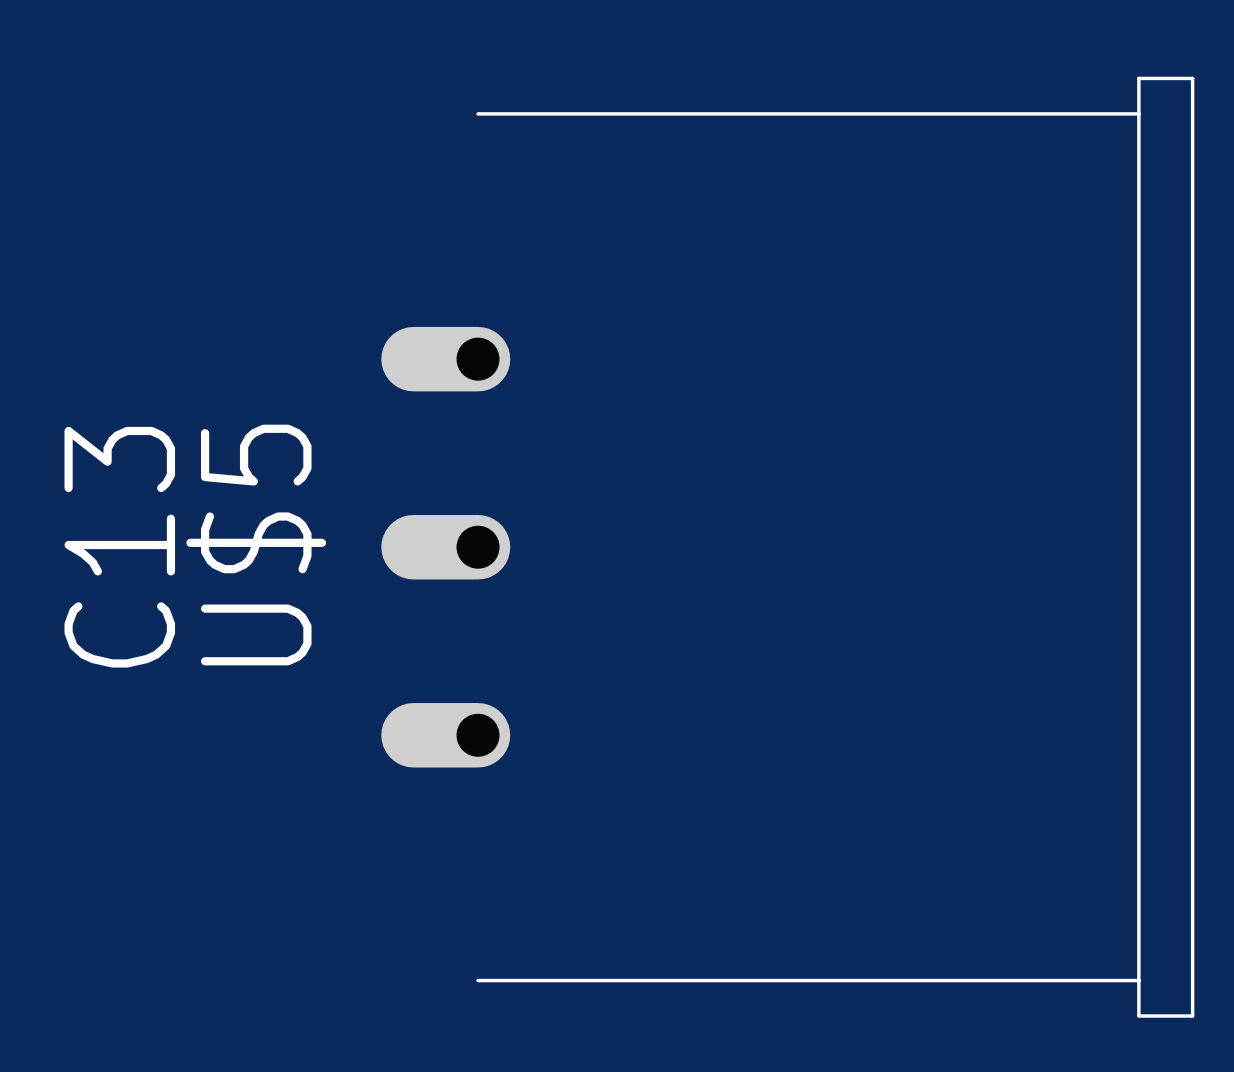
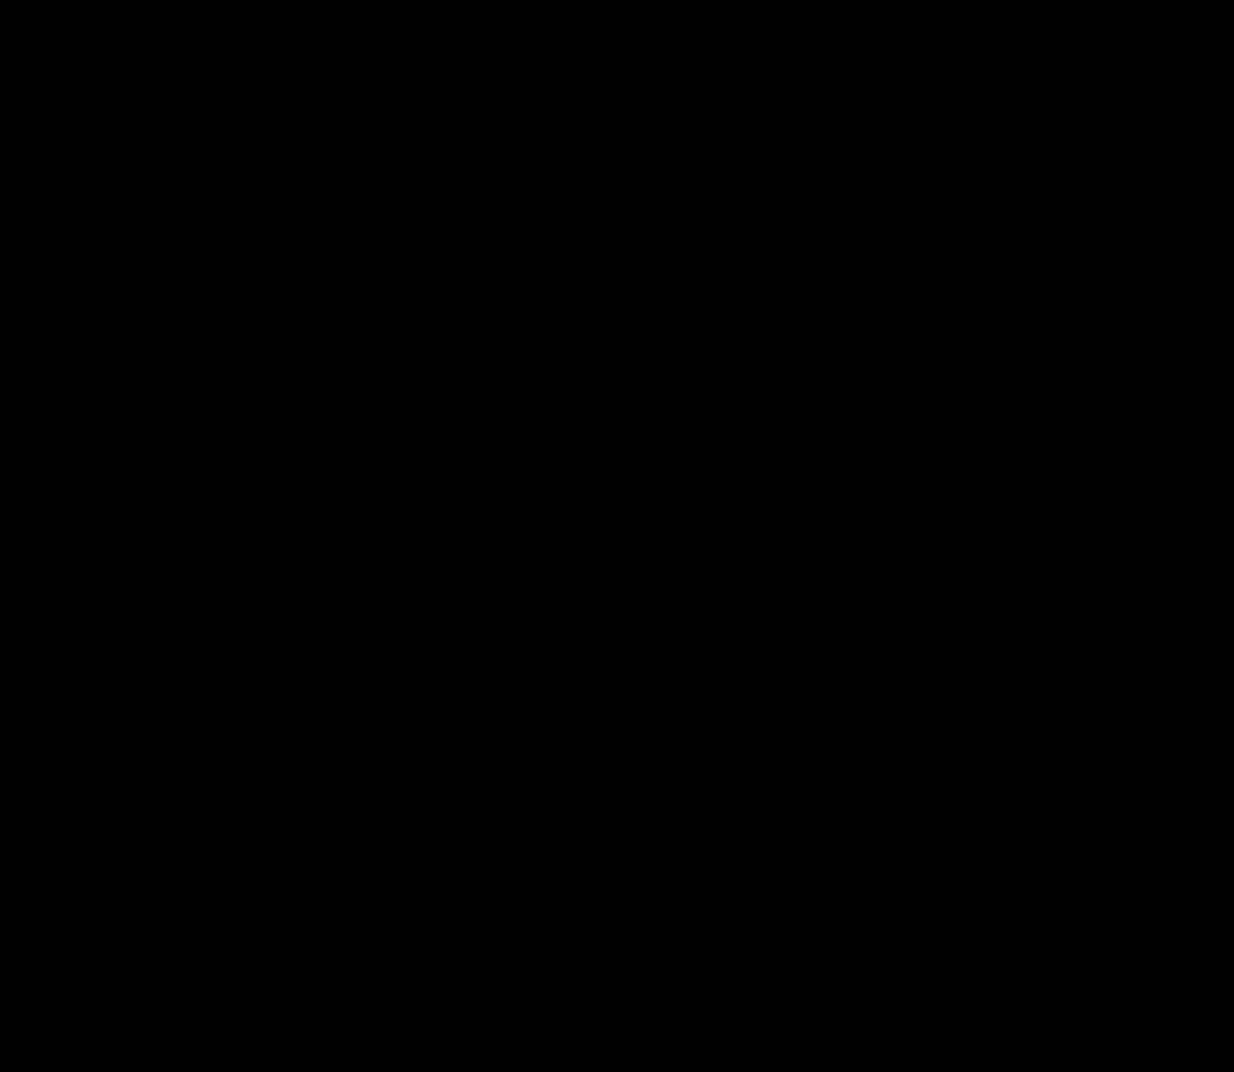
U$5: C13 (787, 547) -> none

